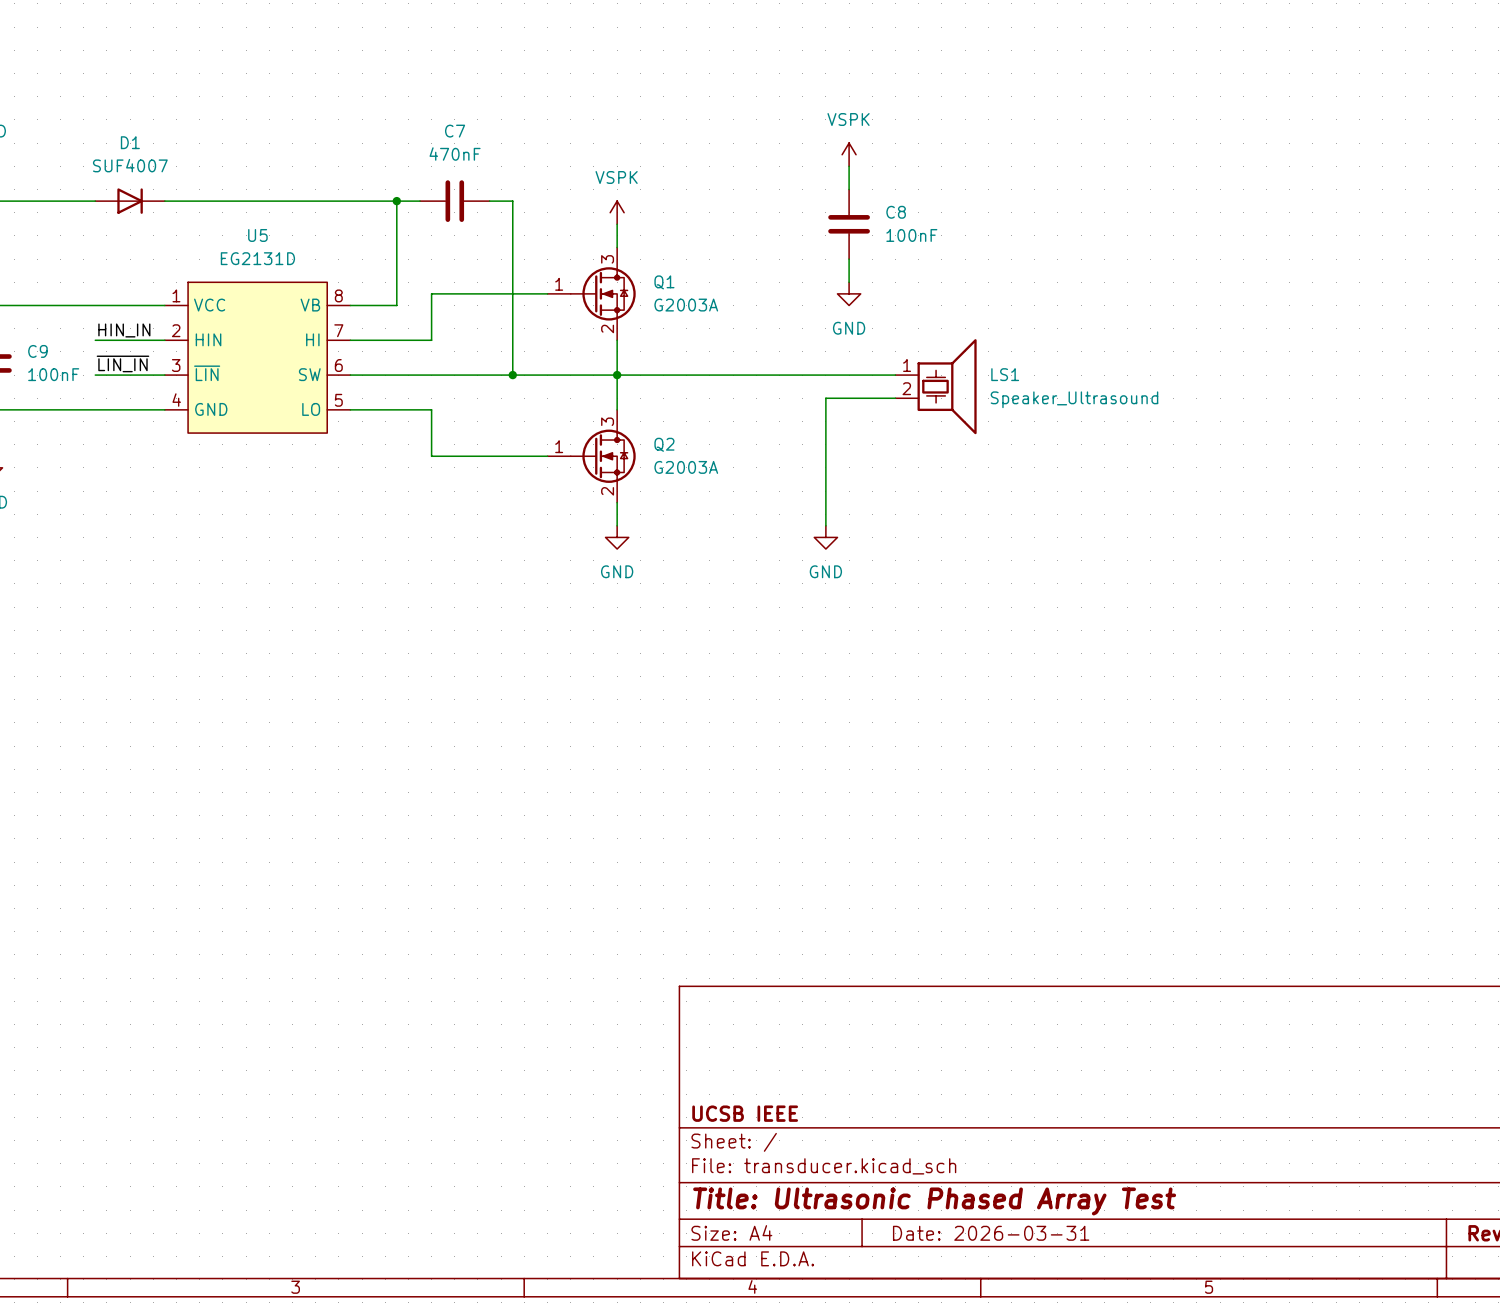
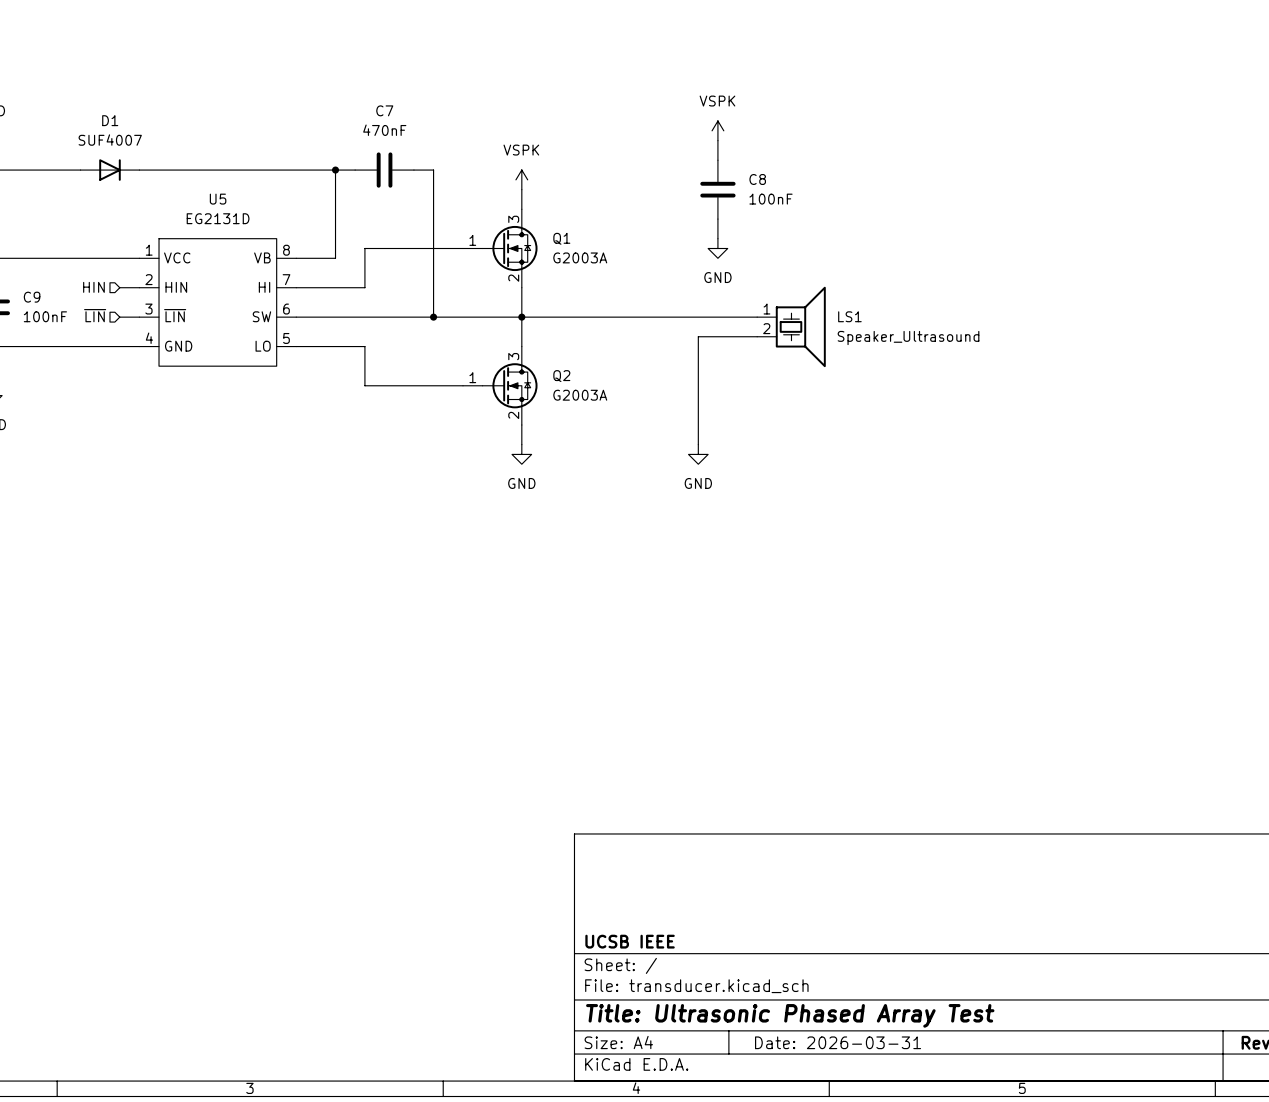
label: HIN_IN (124, 330) -> none
hierarchical label: none -> HIN (93, 287)
wire: (95, 340) (141, 340) -> none
label: ~{LIN_IN} (122, 363) -> none
hierarchical label: none -> ~{LIN} (95, 315)
wire: (95, 375) (141, 375) -> none

